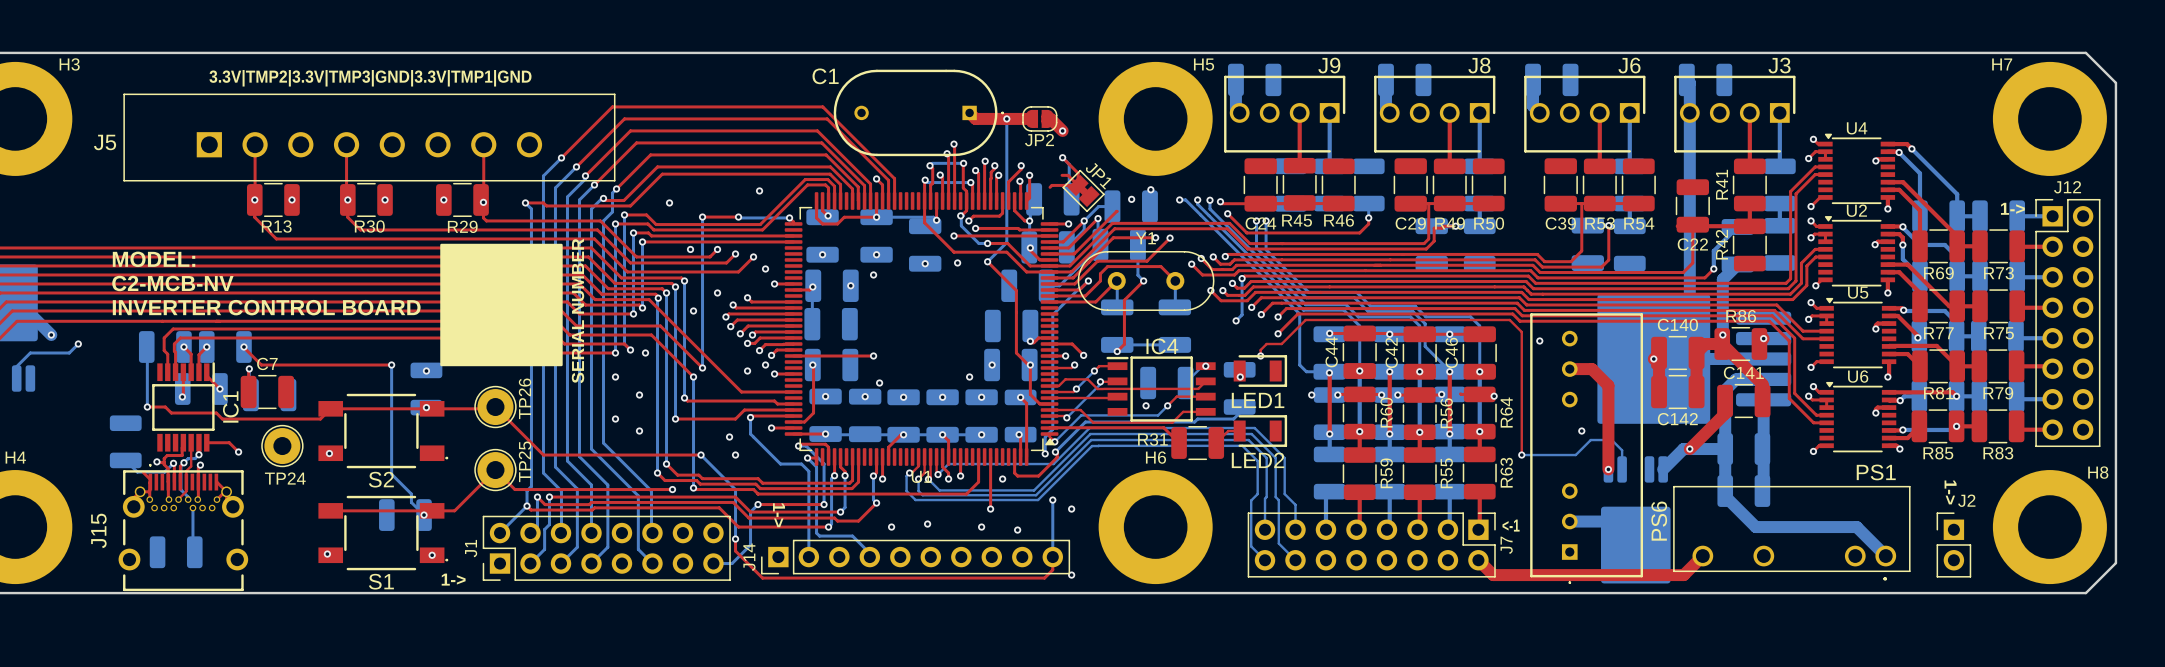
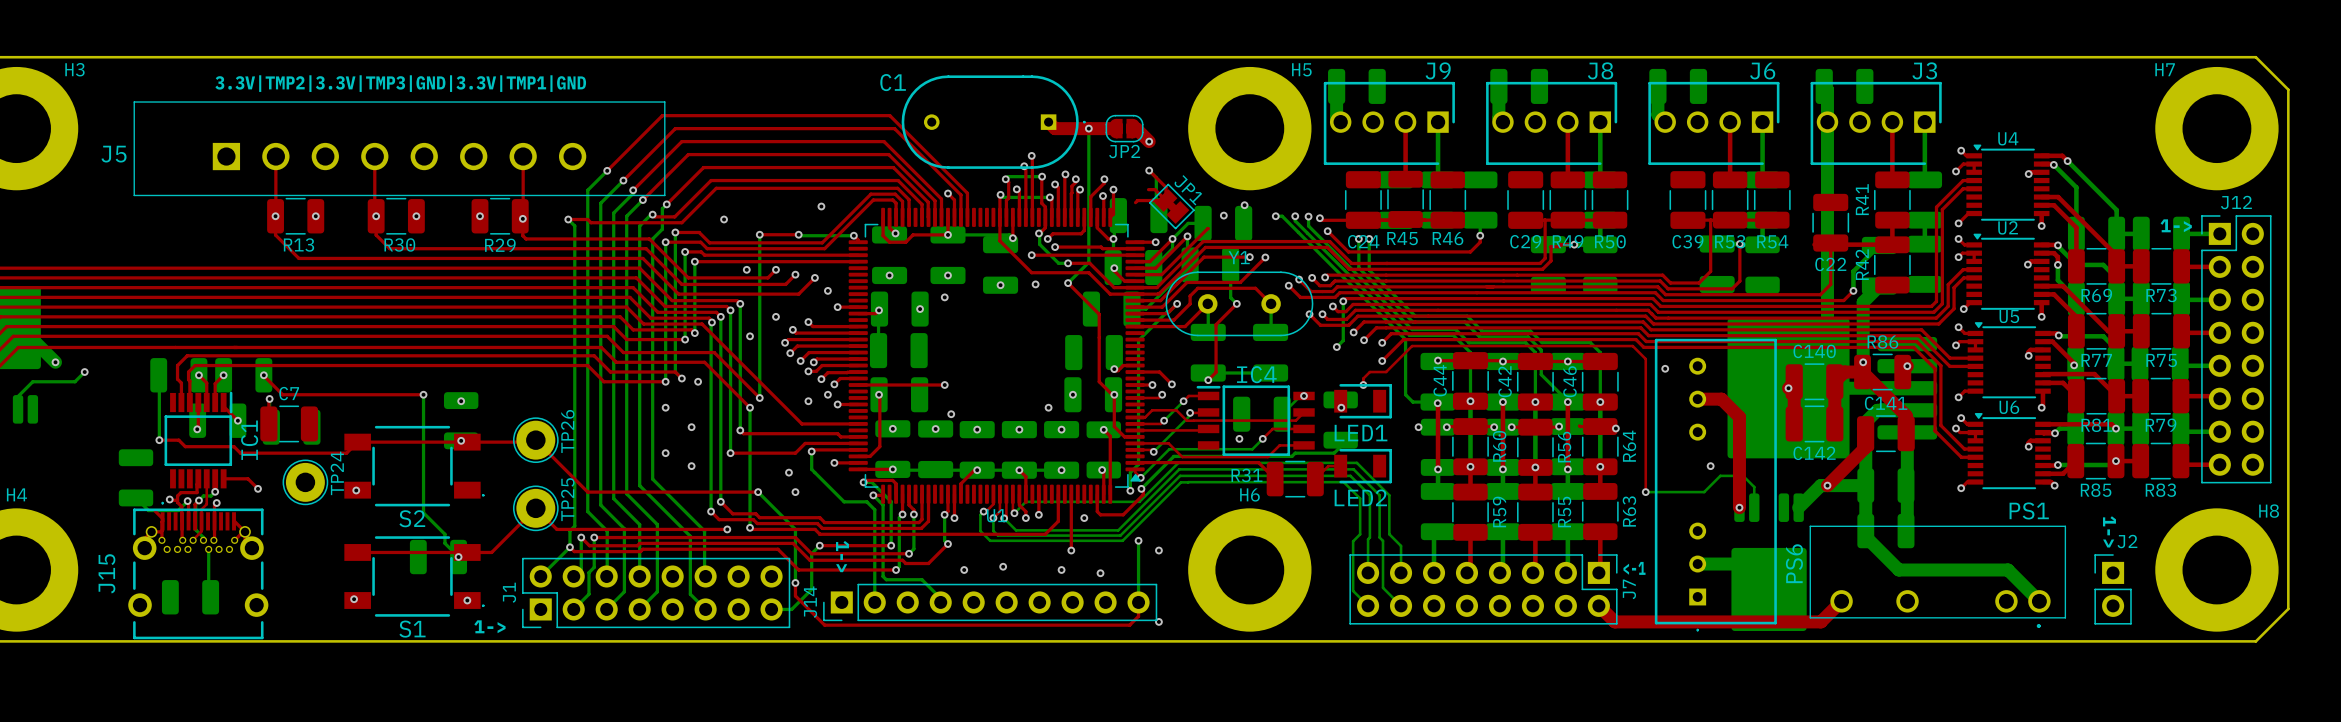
drawing: [440, 243, 563, 367] -> none
text: MODEL: (154, 259) -> none
text: C2-MCB-NV (172, 283) -> none
text: INVERTER CONTROL BOARD (266, 307) -> none
text: SERIAL NUMBER (578, 310) -> none
TP24 name rotation: 0° (285, 478) -> 90° counterclockwise (337, 473)

